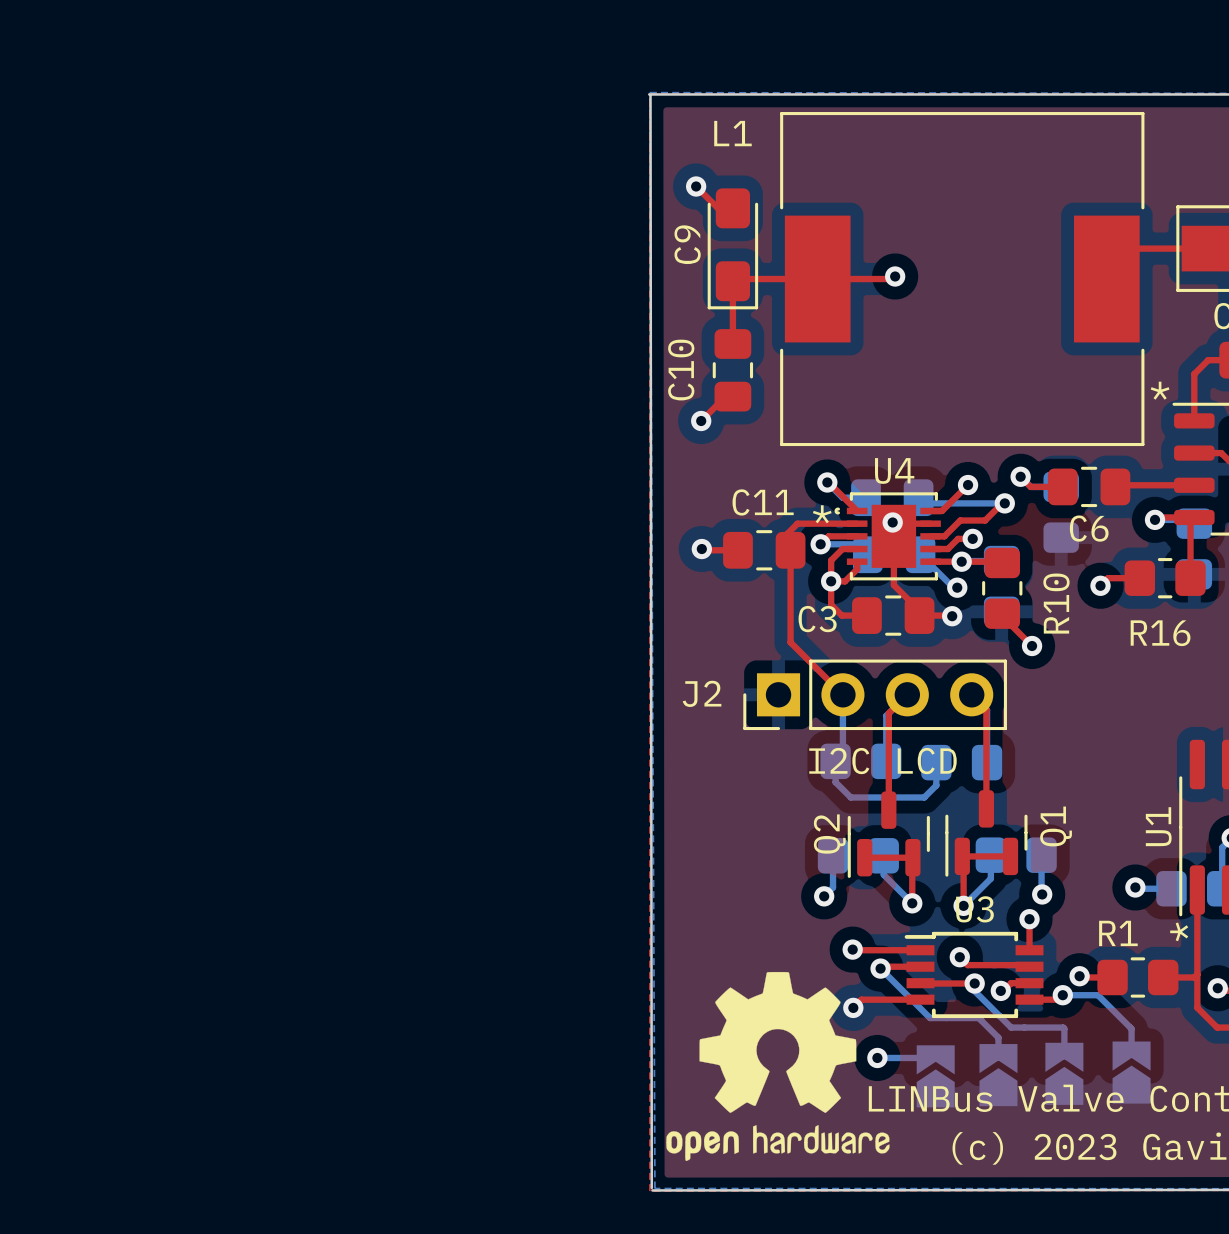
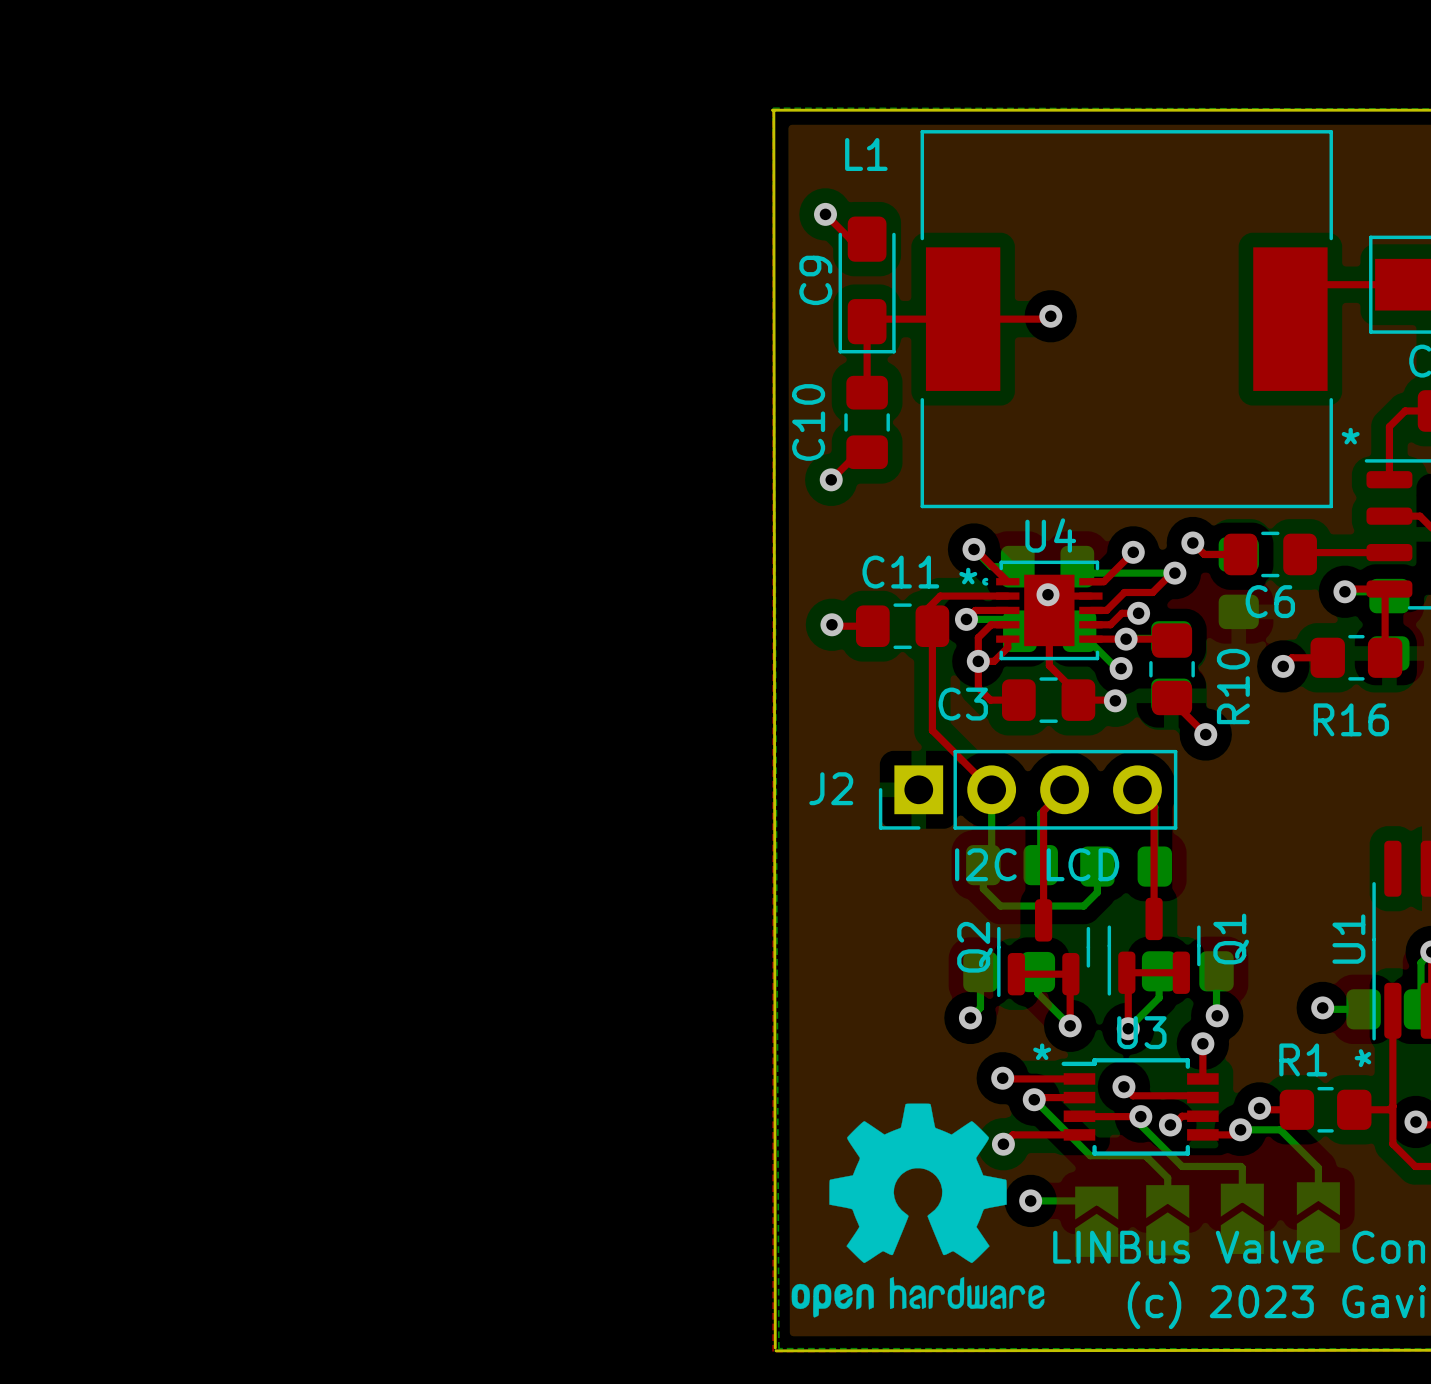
U3 text: none -> * (1042, 1051)

